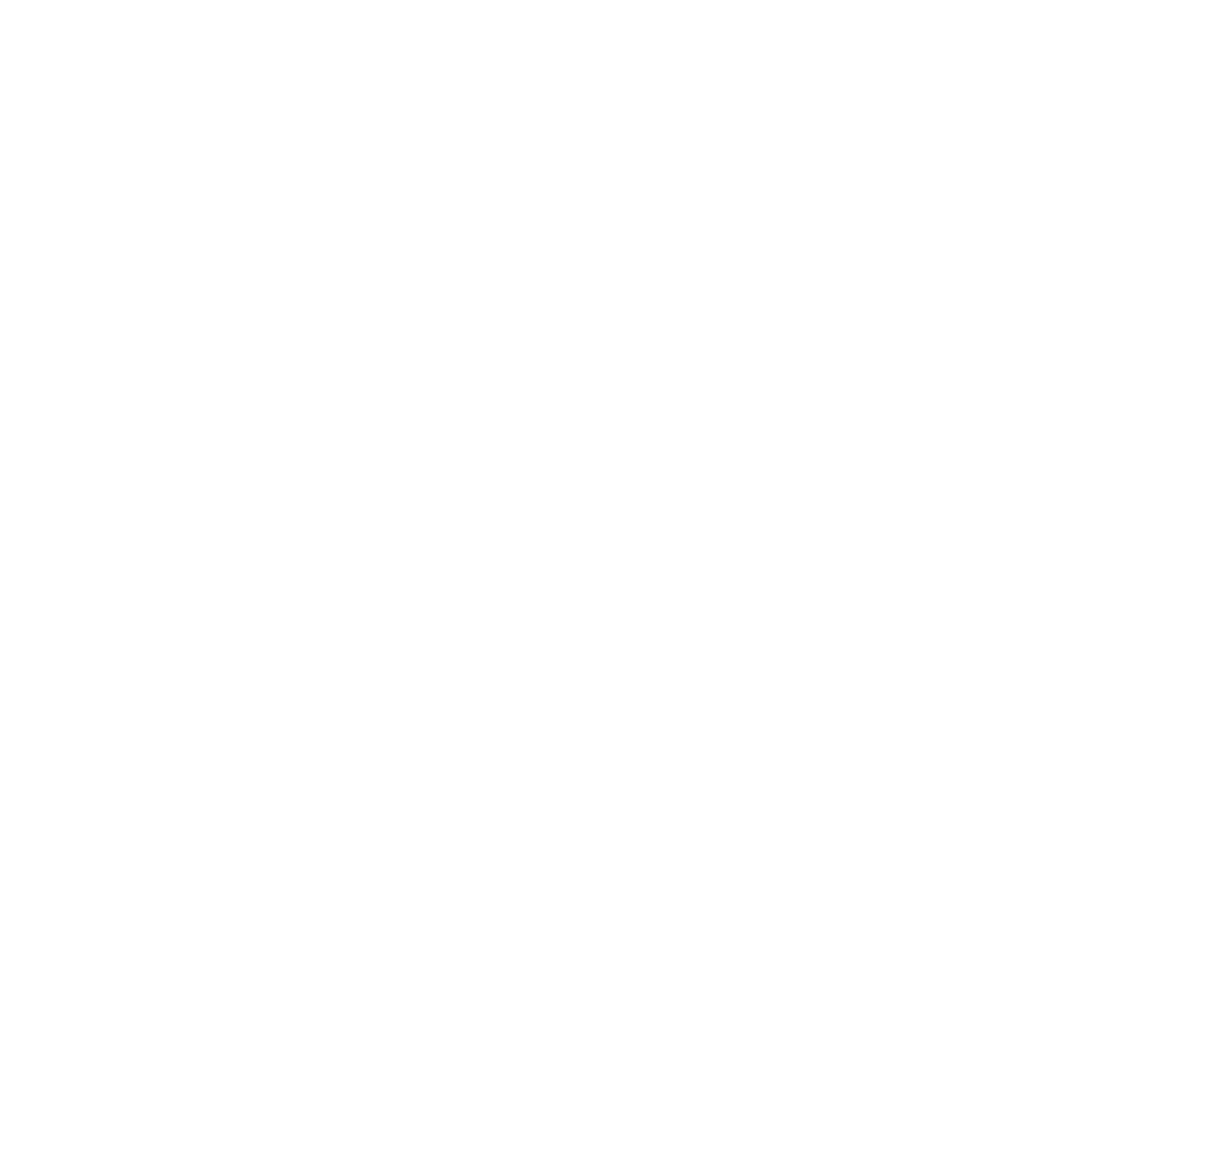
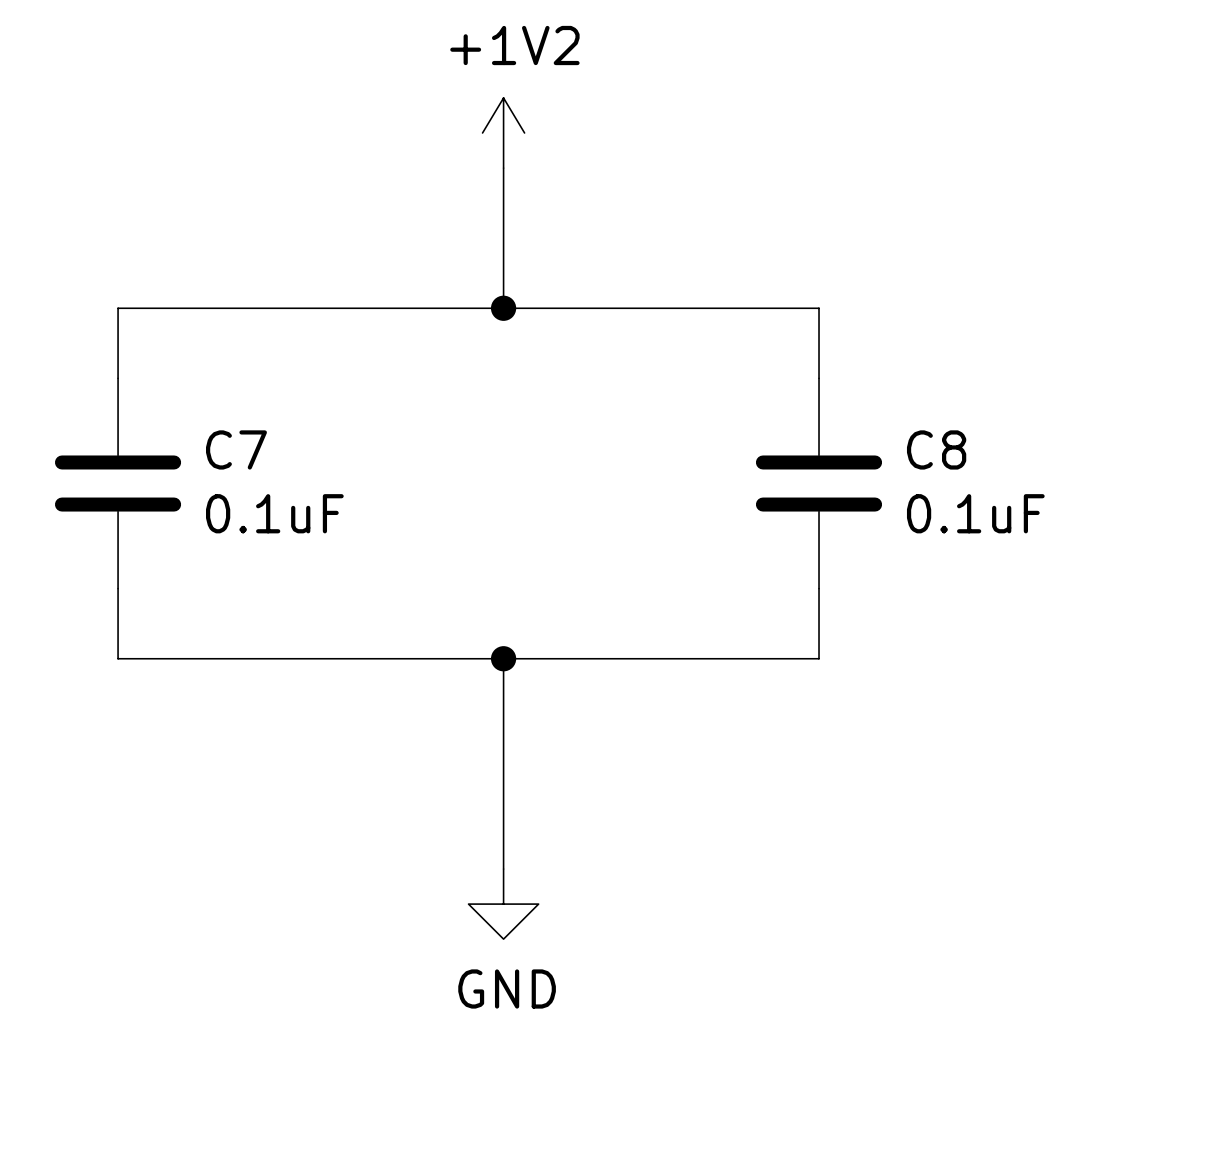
power symbol: none -> +1V2 (503, 133)
wire: none -> (503, 168) (503, 308)
junction: none -> (503, 308)
wire: none -> (118, 378) (118, 308) (819, 308) (819, 378)
C7: none -> 0.1uF (118, 483)
C8: none -> 0.1uF (819, 483)
wire: none -> (118, 588) (118, 658) (819, 658) (819, 588)
wire: none -> (503, 658) (503, 869)
junction: none -> (503, 658)
power symbol: none -> GND (503, 904)

